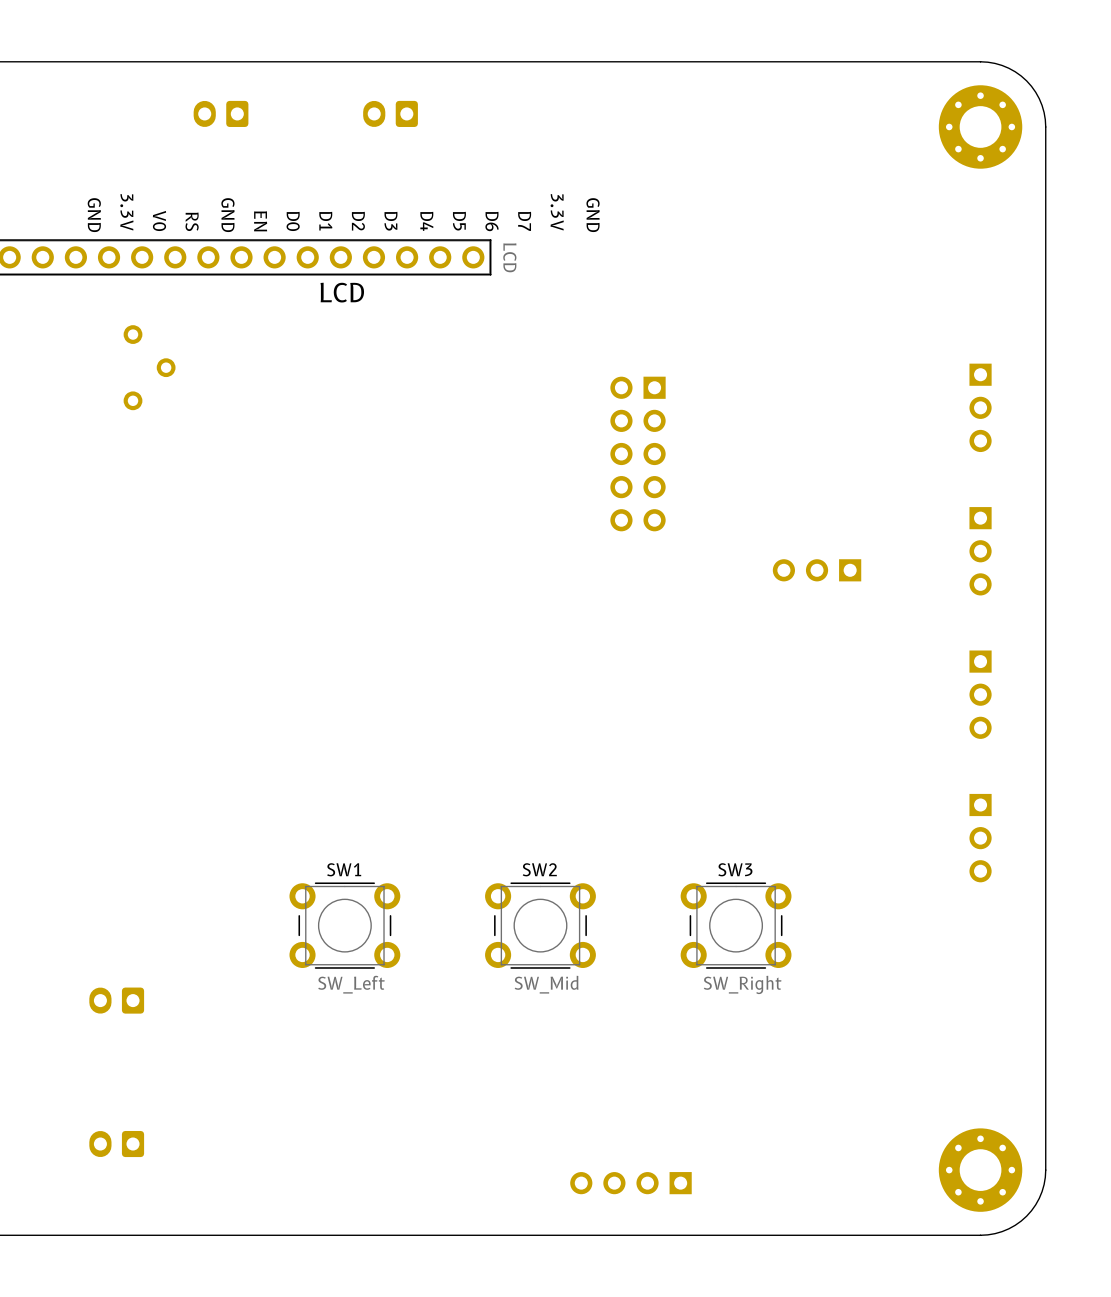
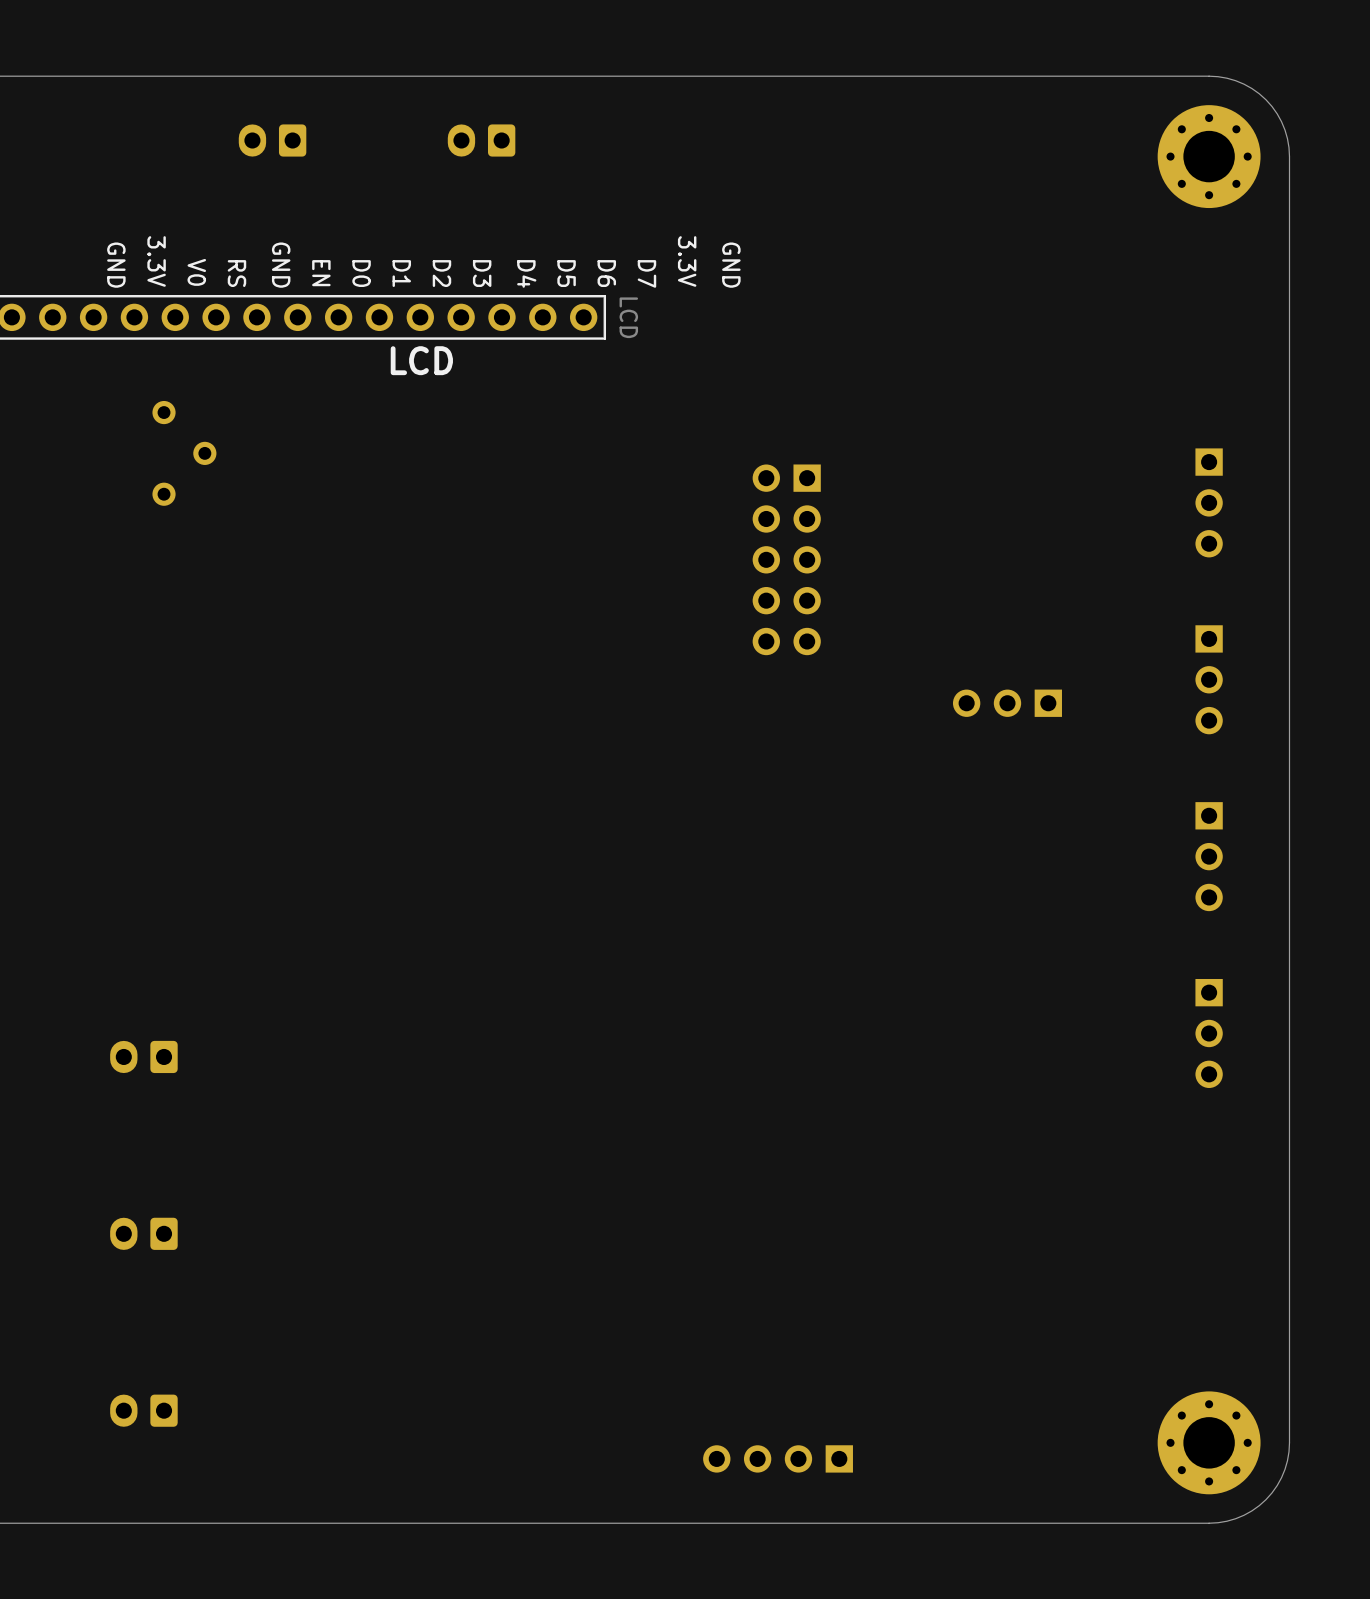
part: none -> (143, 1056)
SW1: SW_Left (344, 925) -> none
SW2: SW_Mid (540, 925) -> none
SW3: SW_Right (736, 925) -> none

